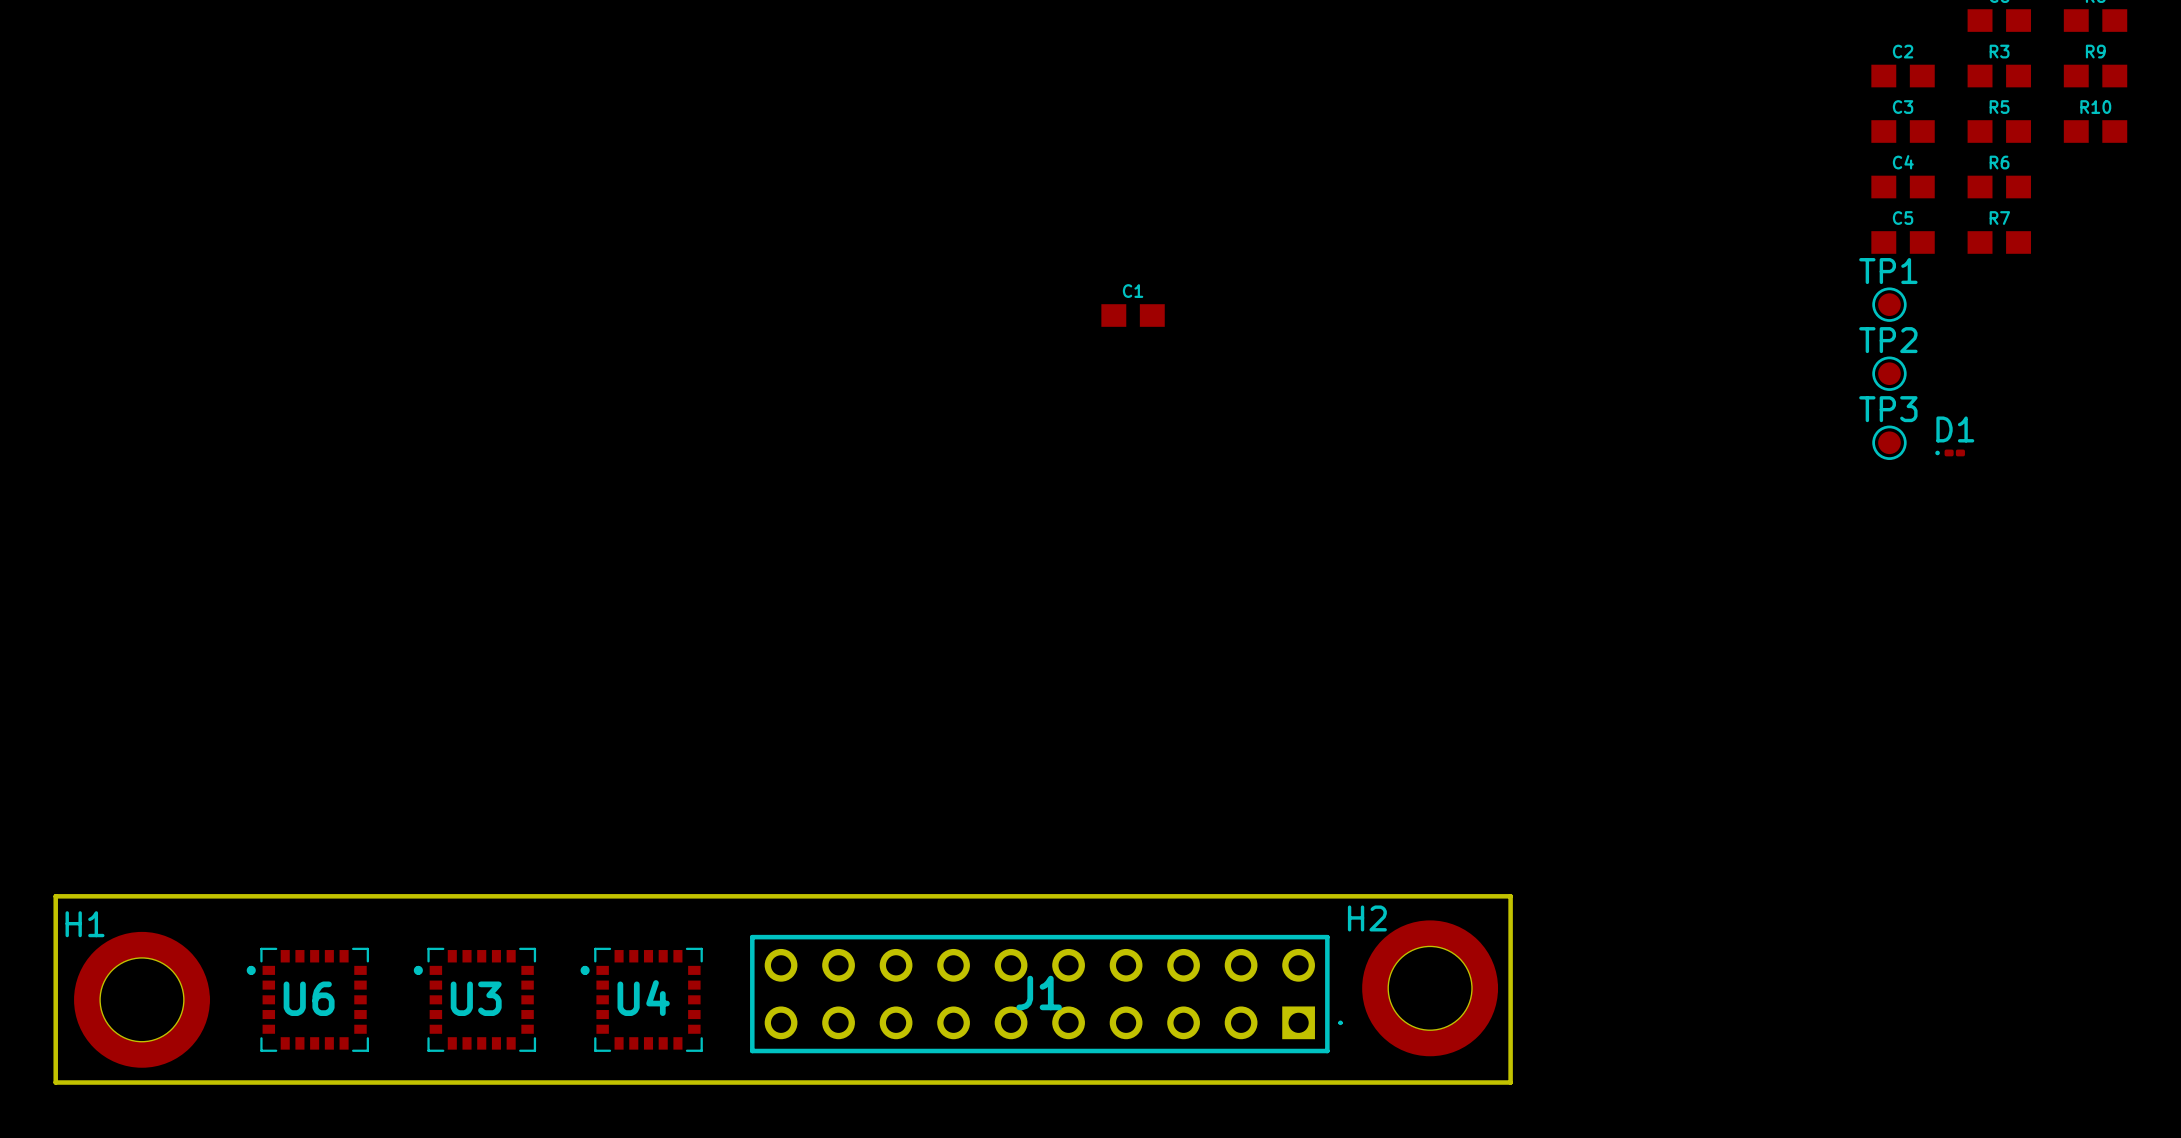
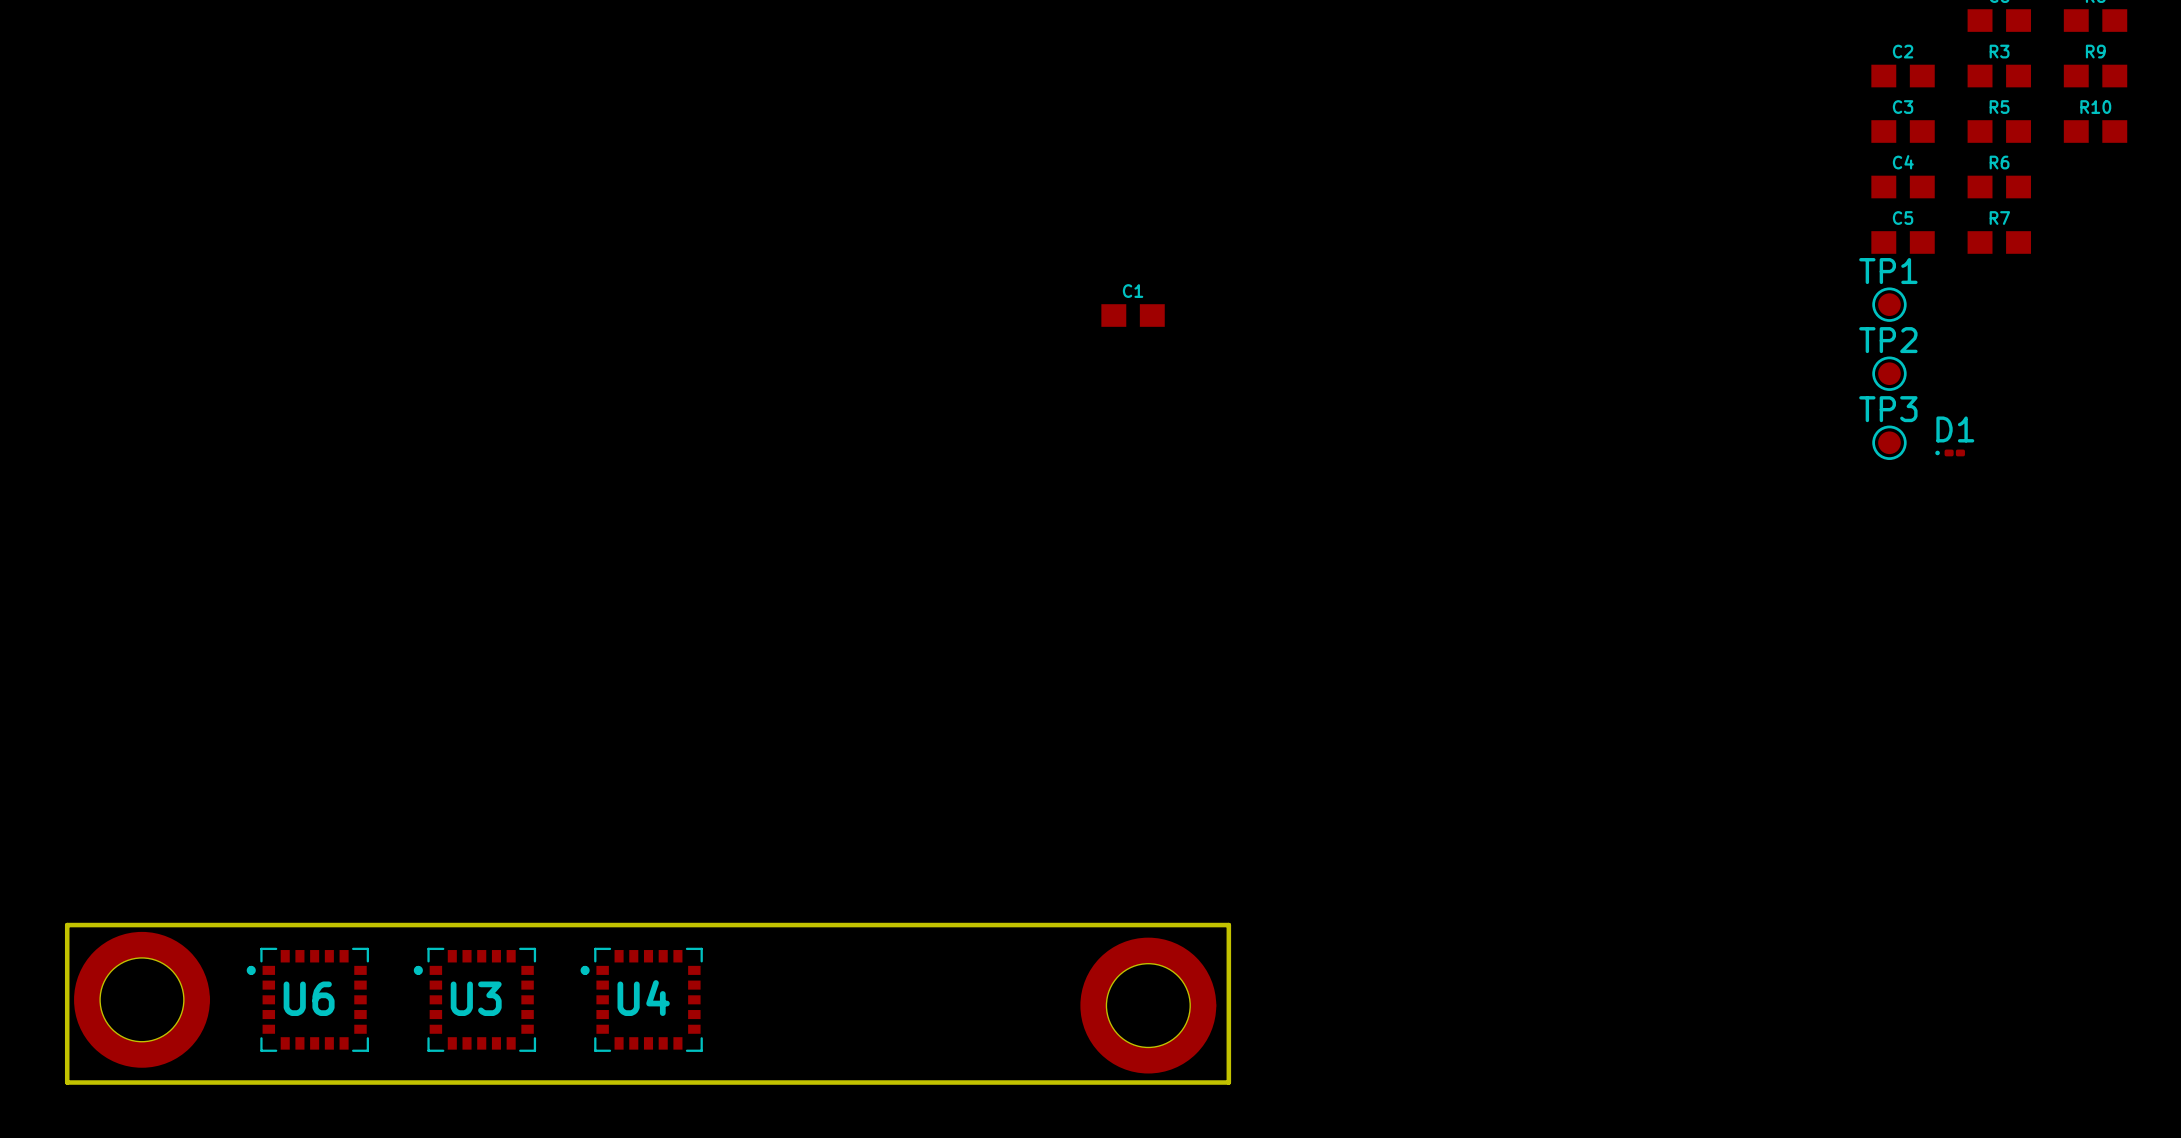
H1 name: H1 (85, 924) -> none
H2: (1430, 988) -> none
J1: (1046, 994) -> none
part: none -> (1148, 1005)
board edge: (67, 1082) (55, 1082) (55, 896) (1510, 896) (1510, 1082) (1228, 1082) -> (67, 1082) (67, 925) (1228, 925) (1228, 1082)

